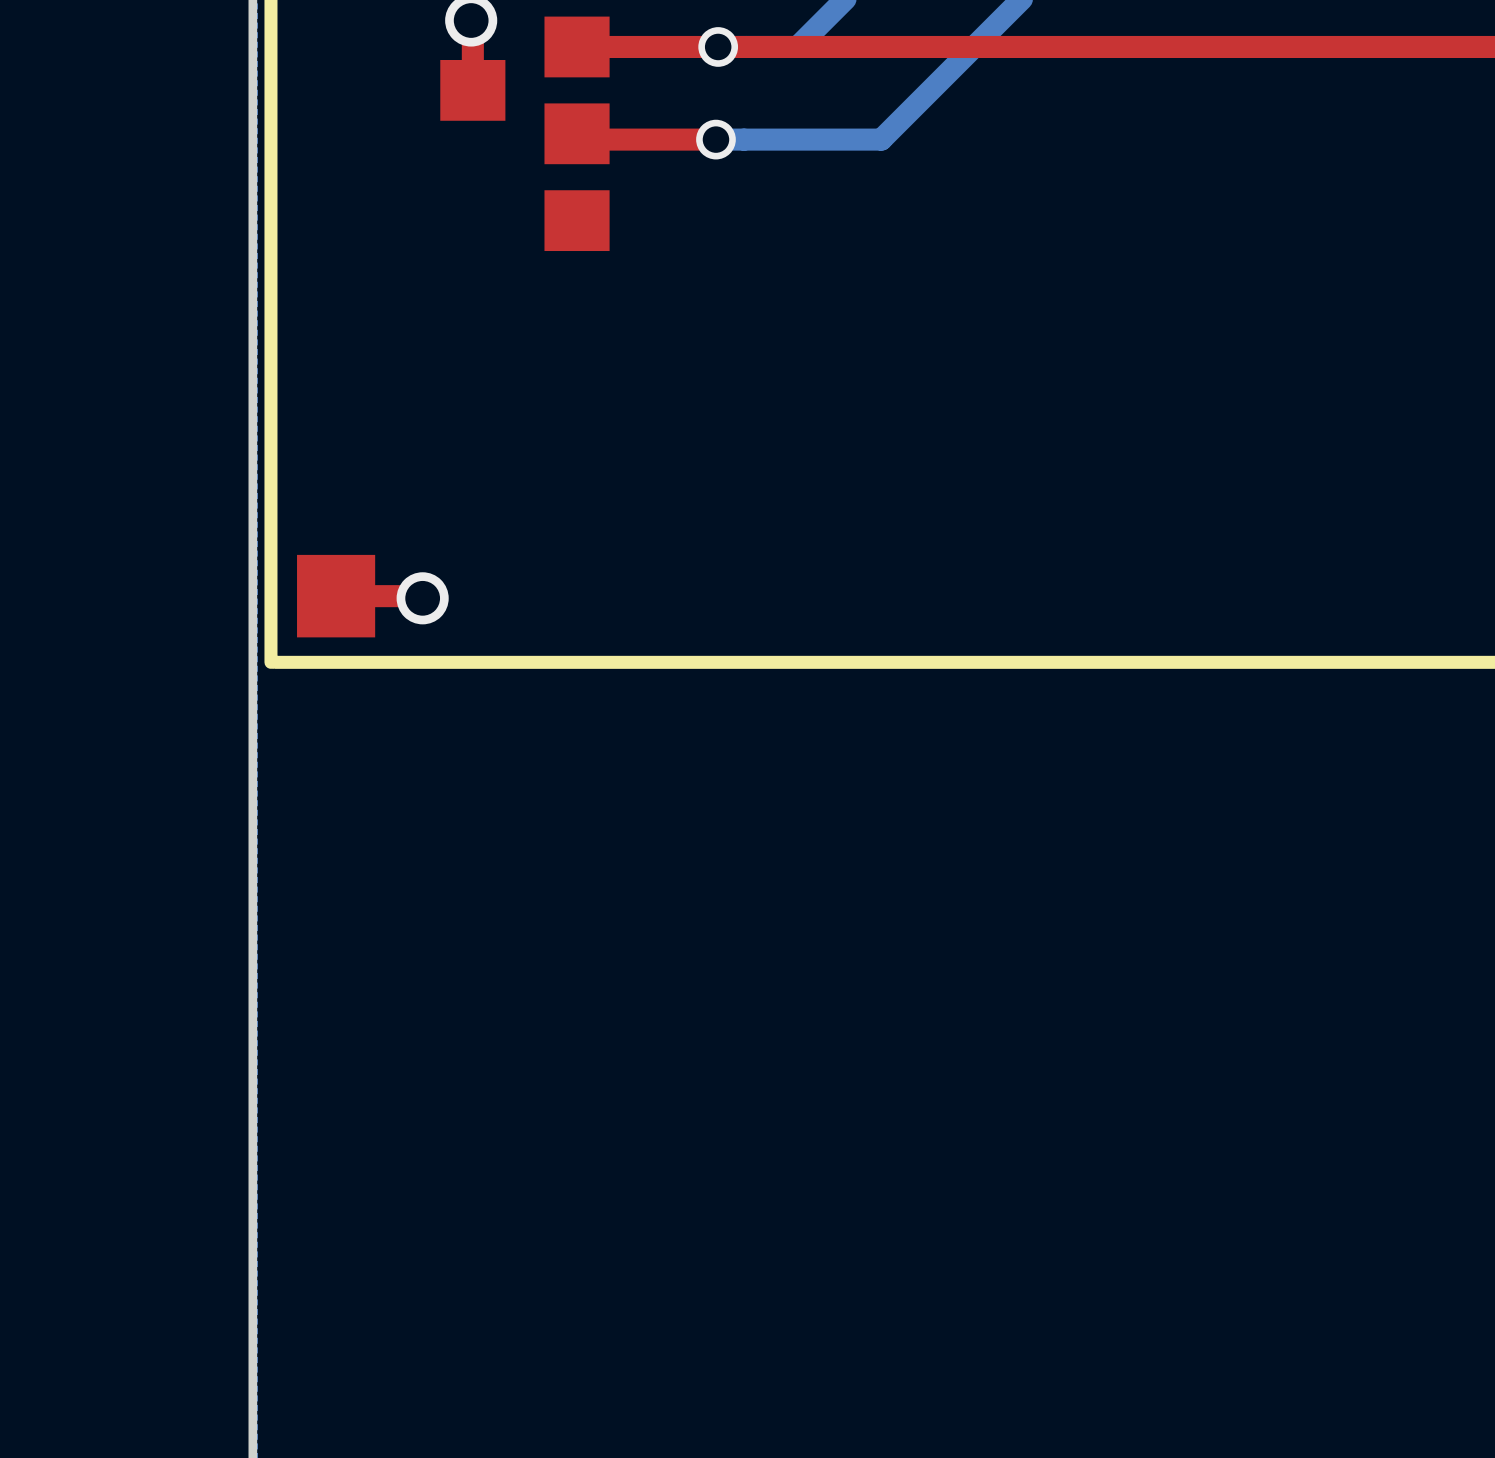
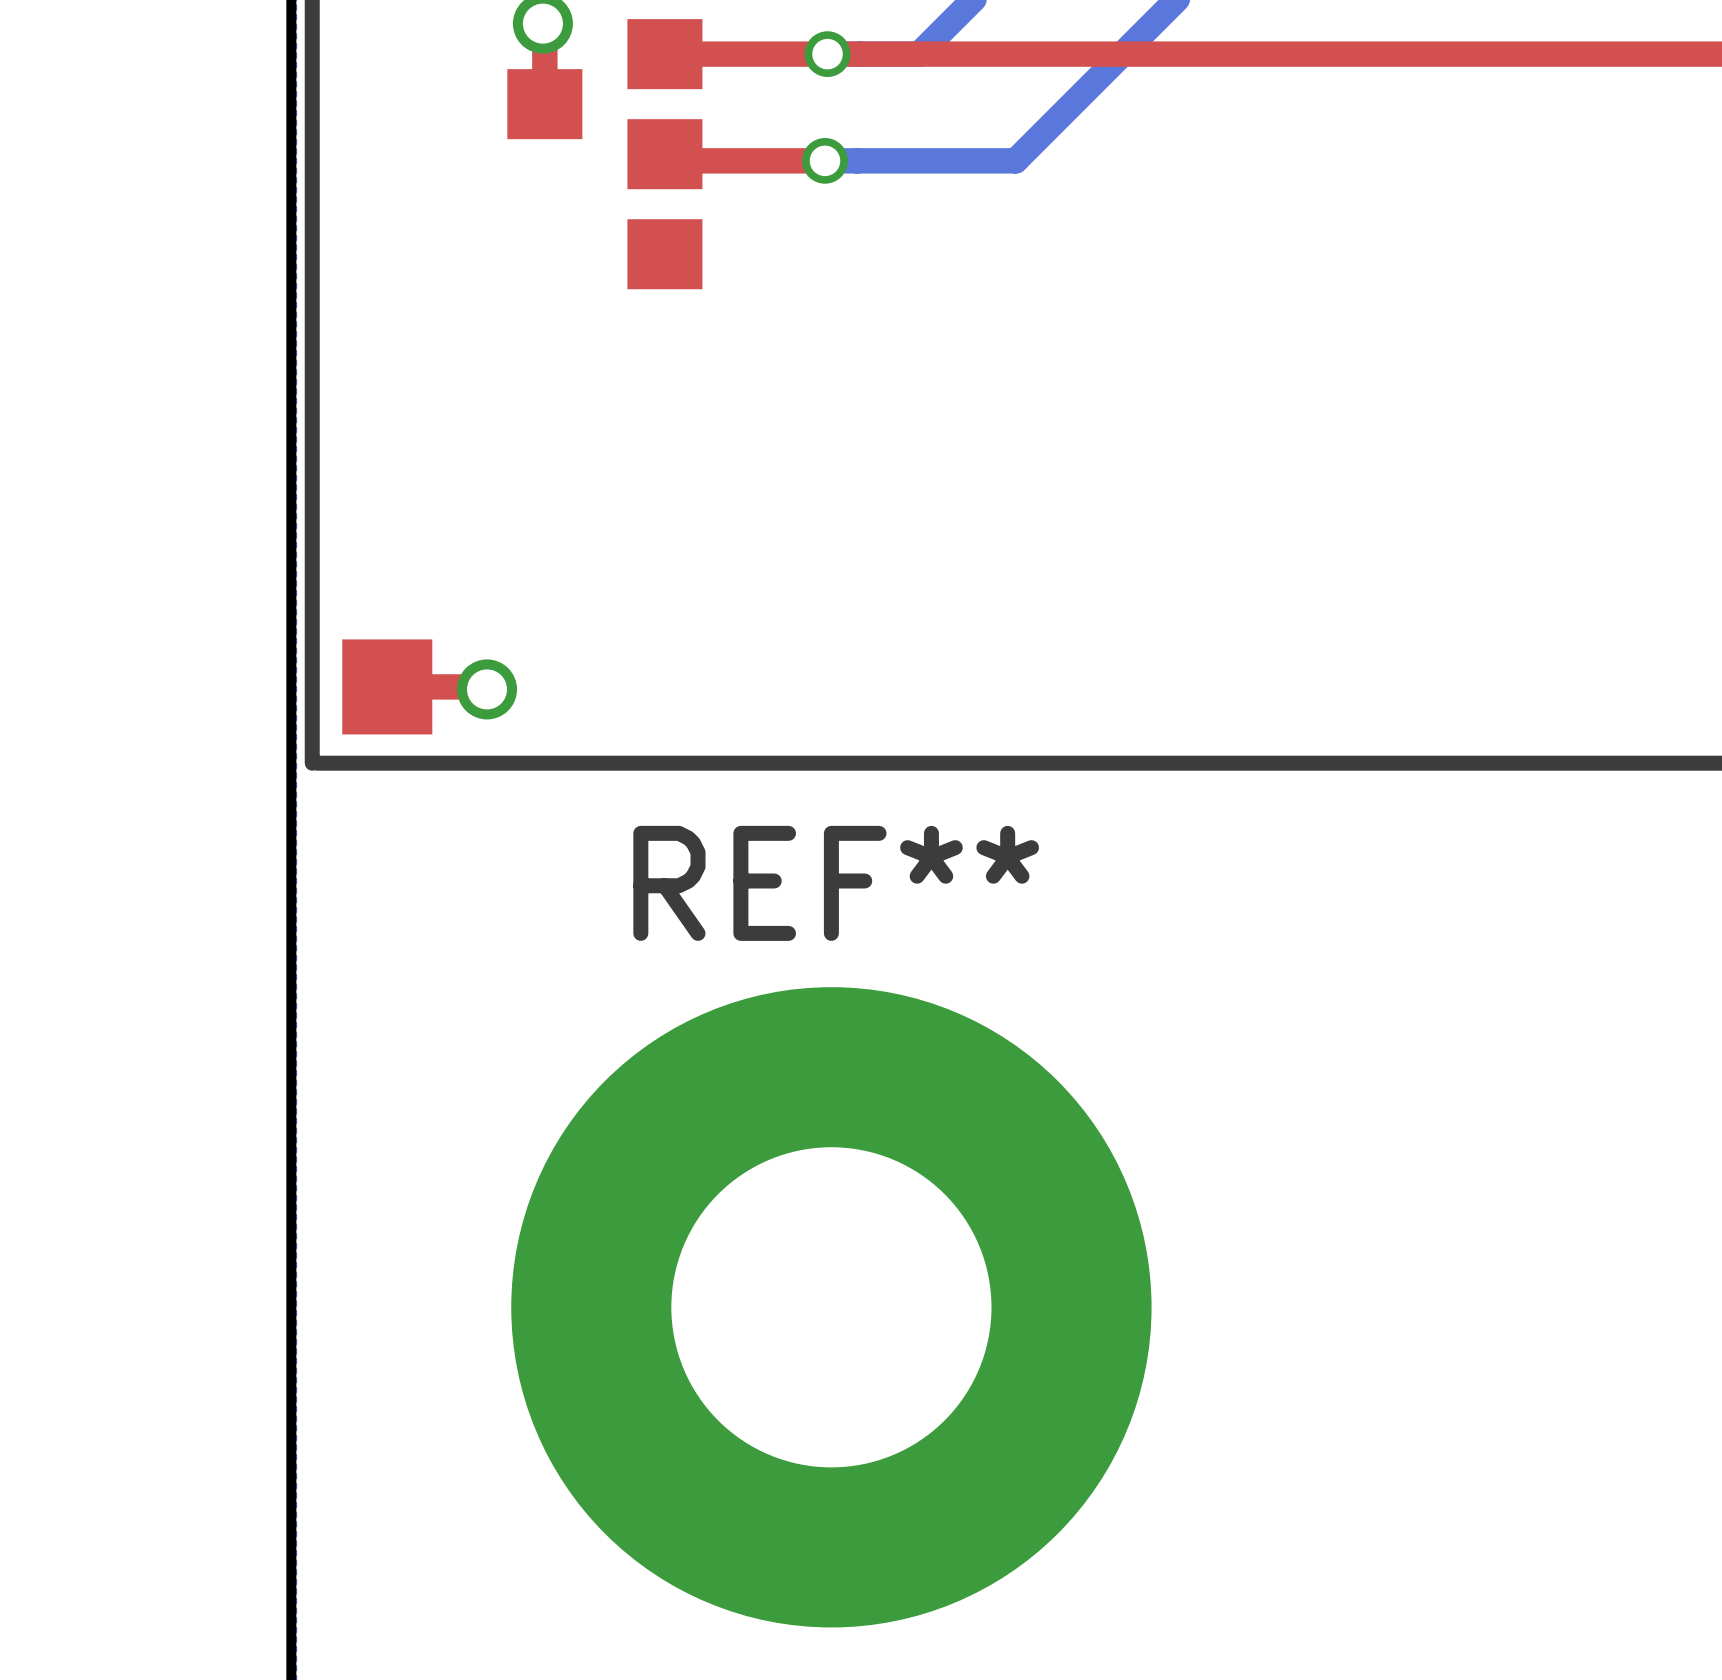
REF**: none -> (831, 1307)

